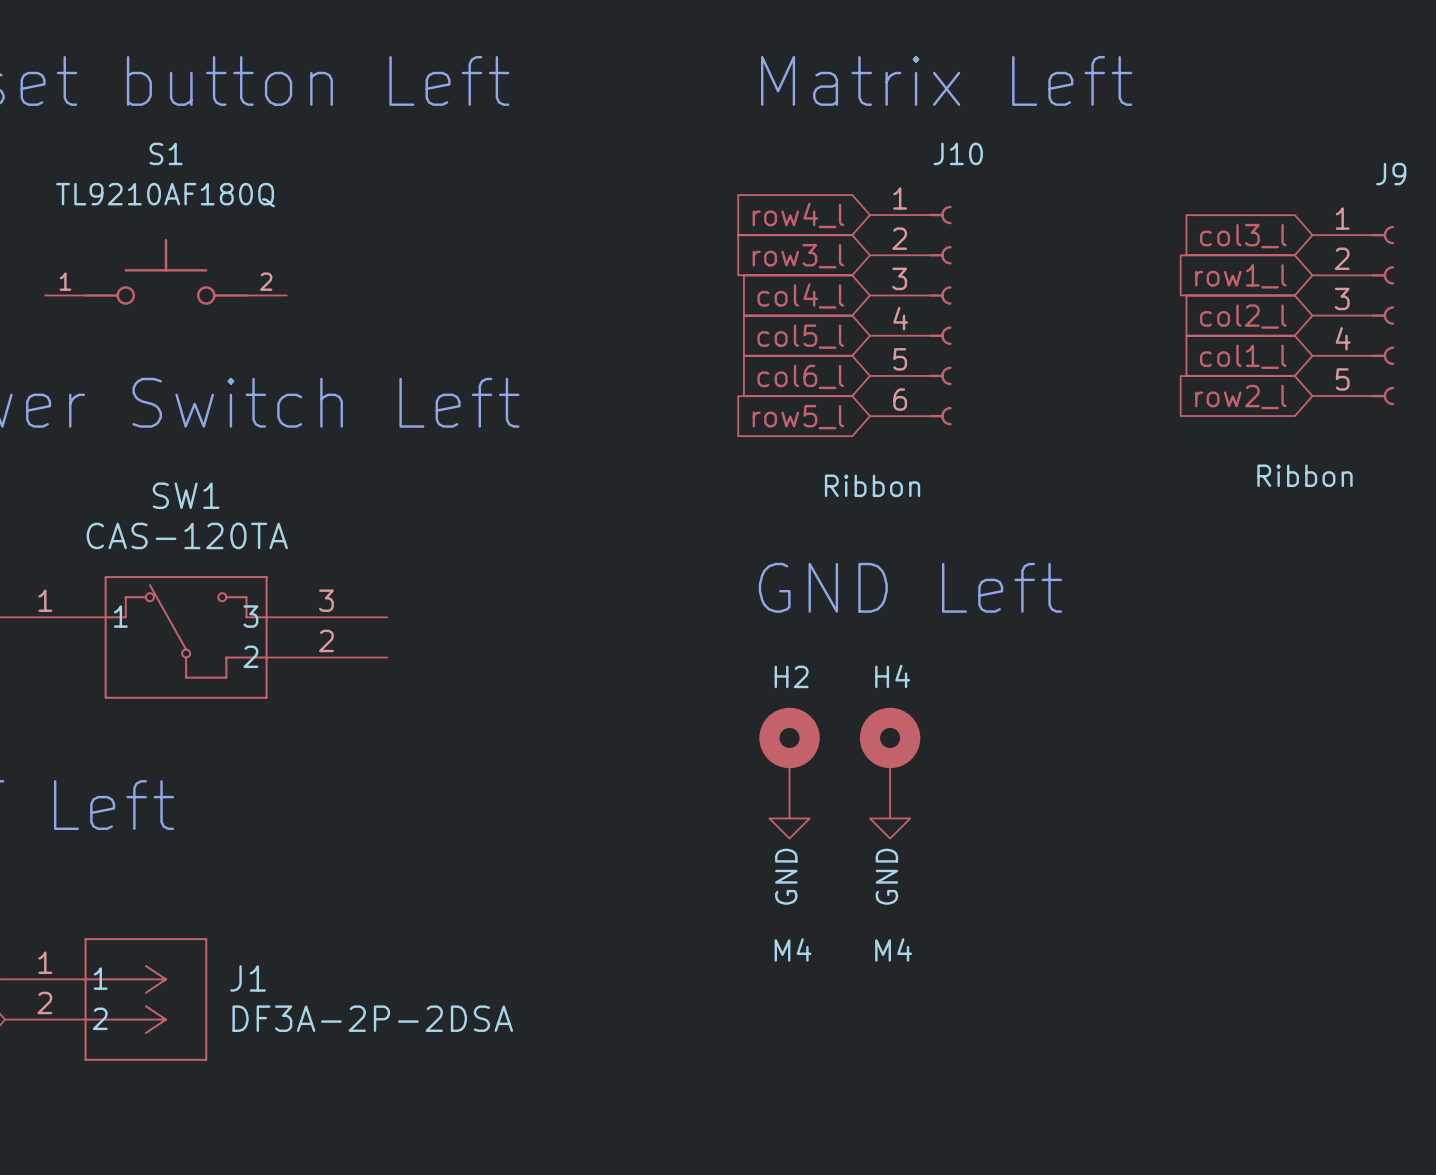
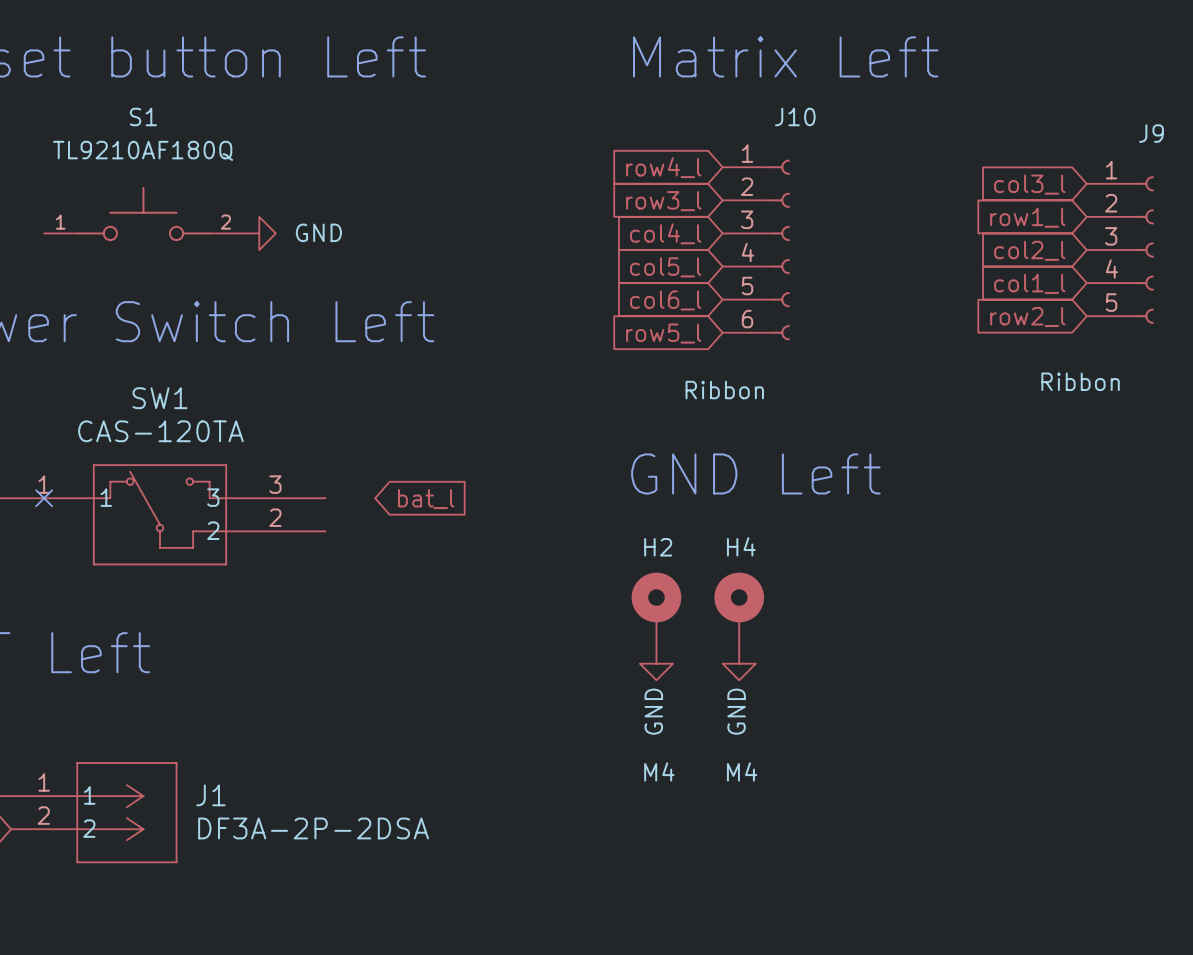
power symbol: none -> GND (259, 233)
no-connect mark: none -> (44, 498)
global label: none -> bat_l (426, 499)

